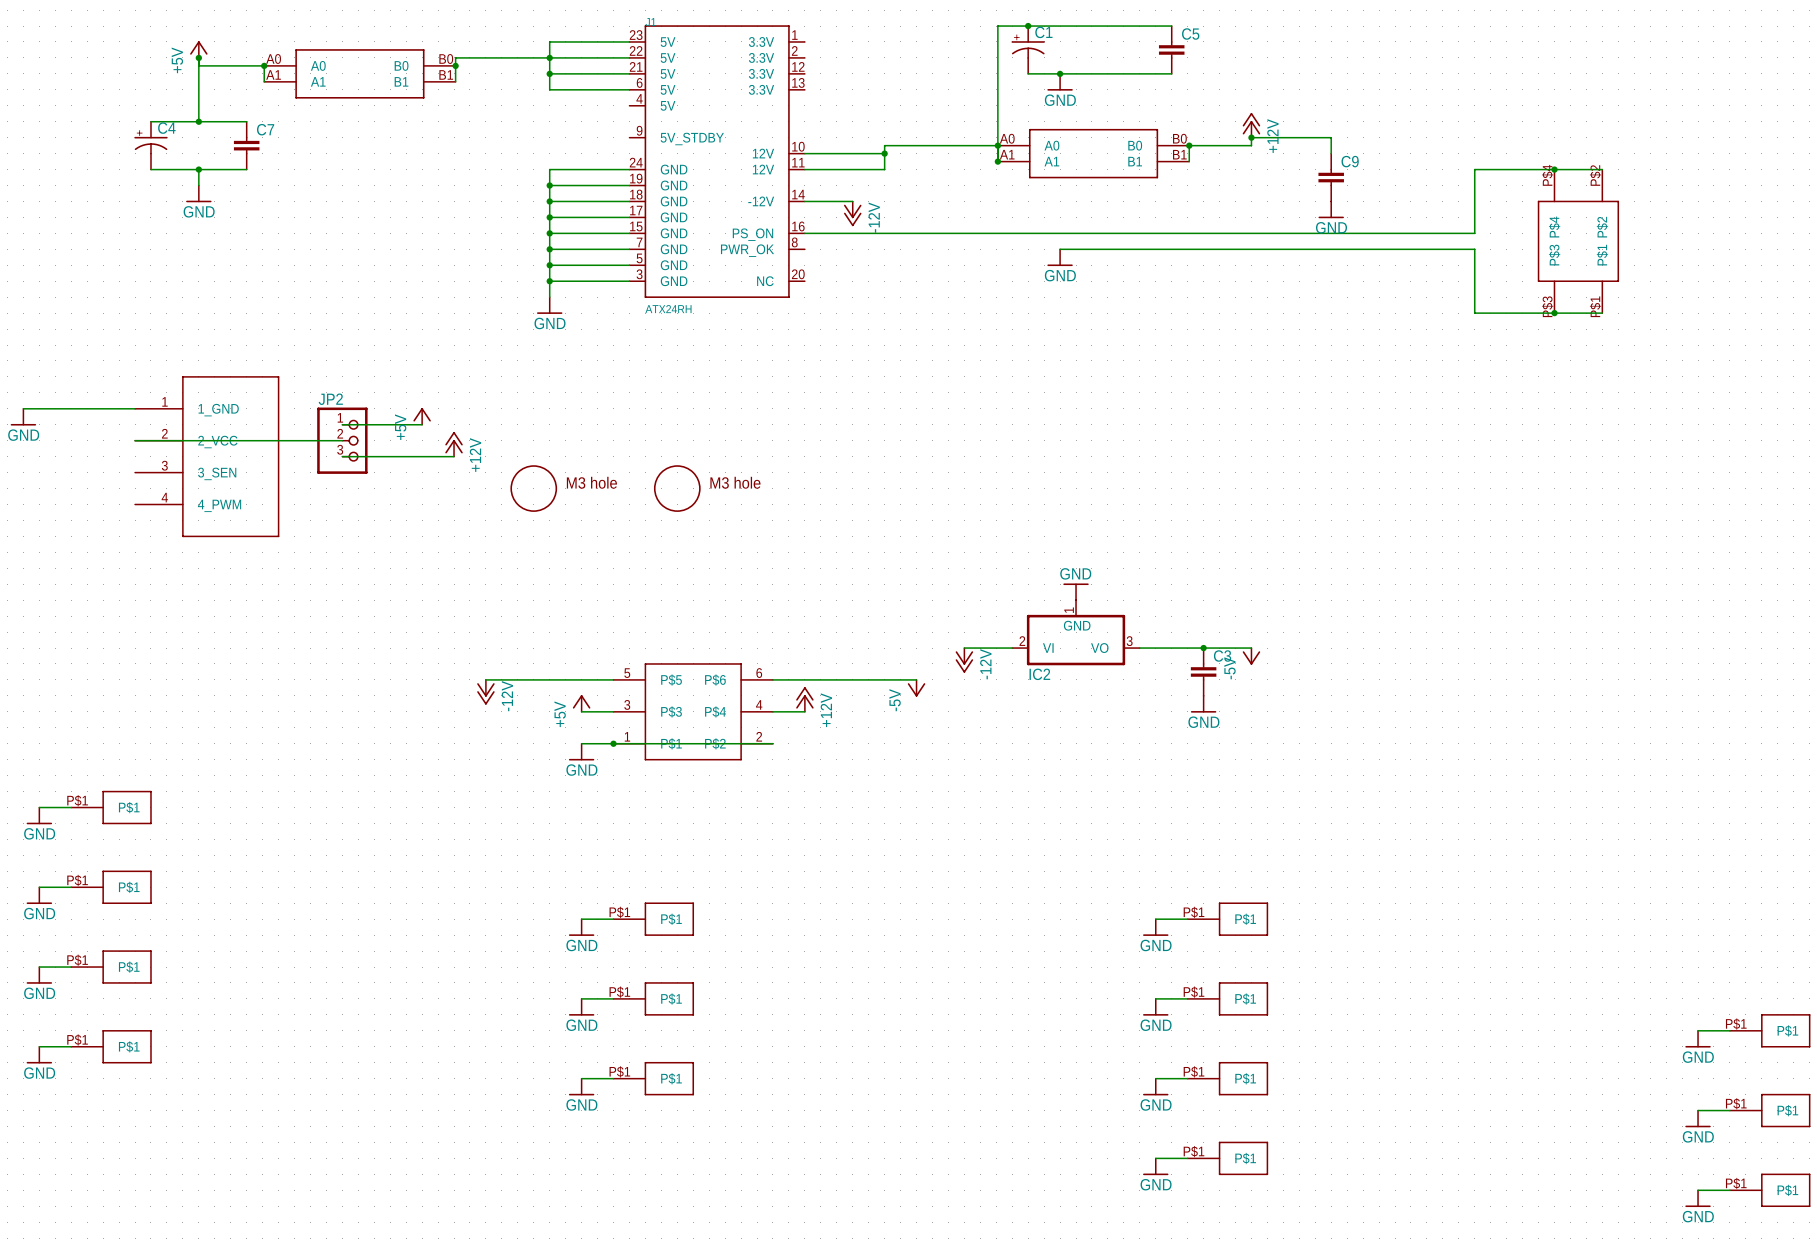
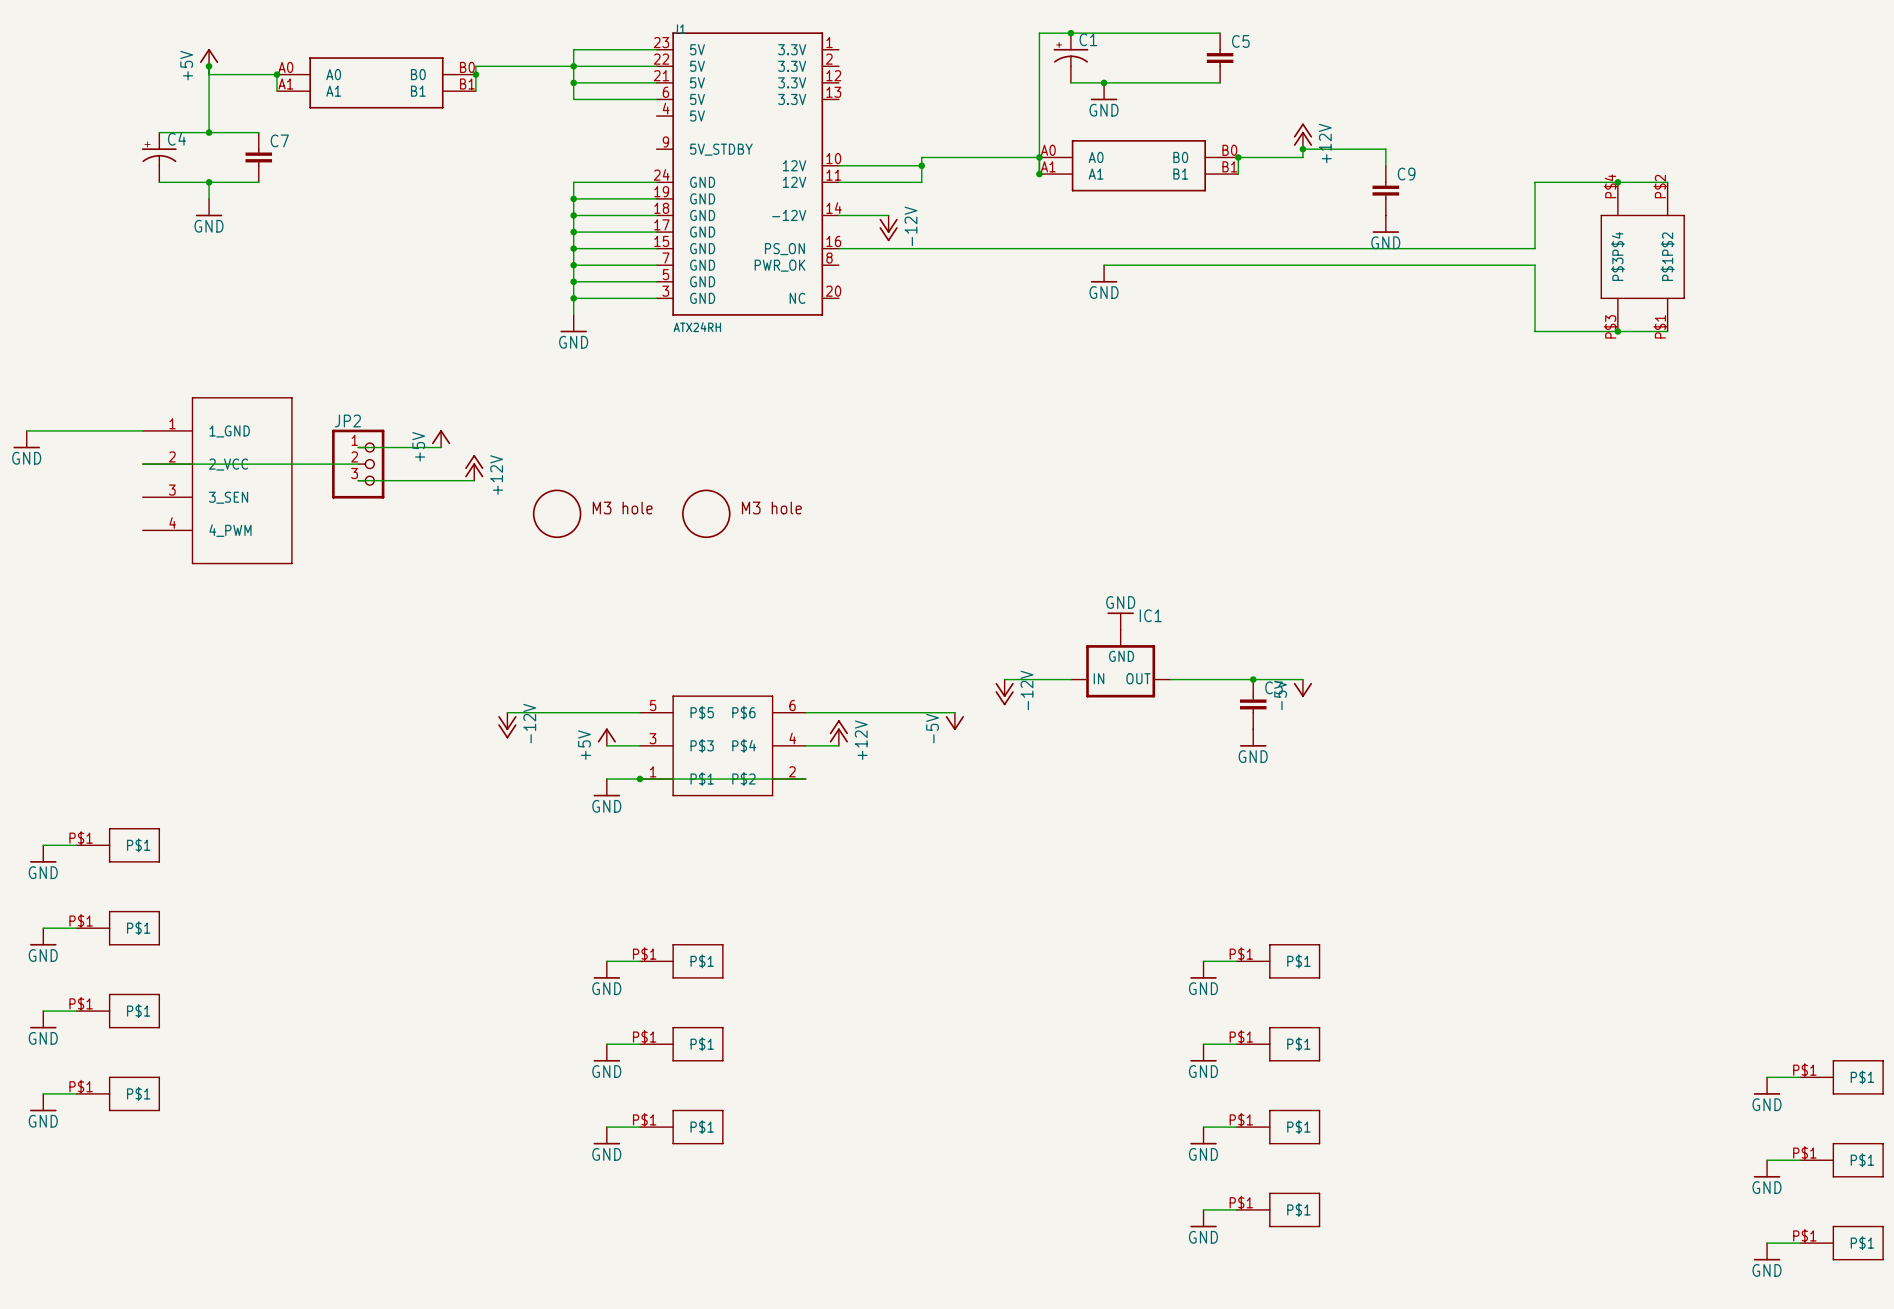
IC2: (1076, 632) -> none
IC1: none -> (1120, 663)

